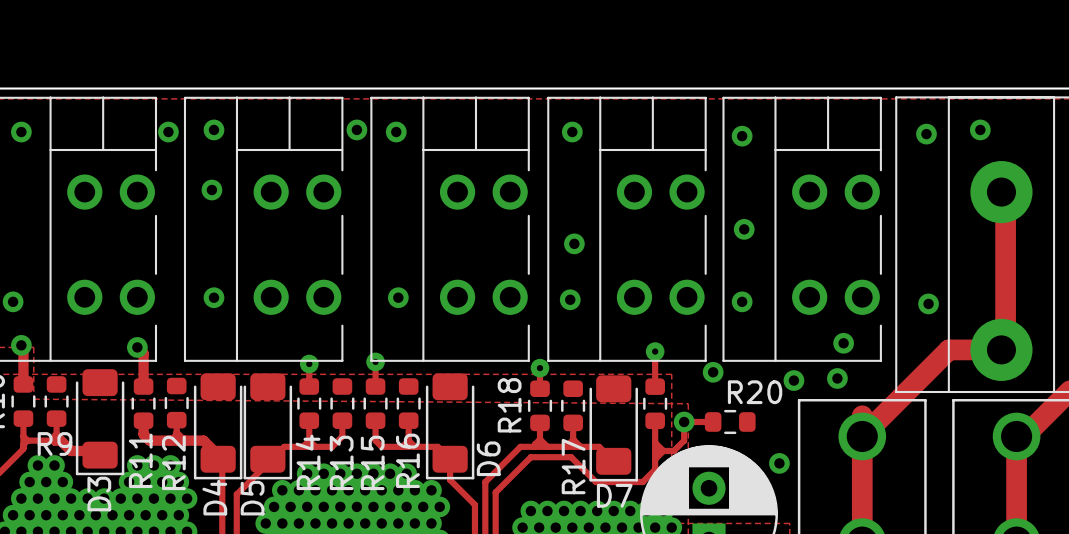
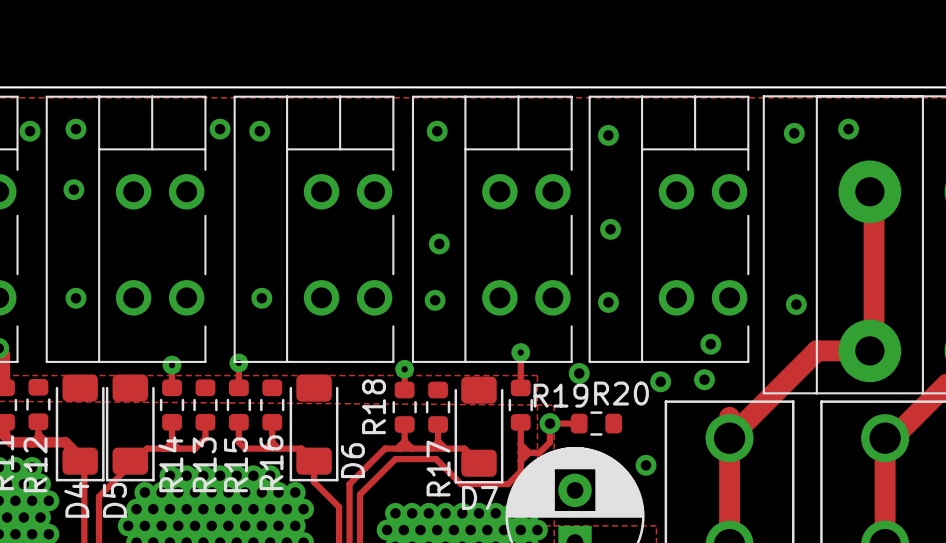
R19 name: none -> R19 (560, 395)

